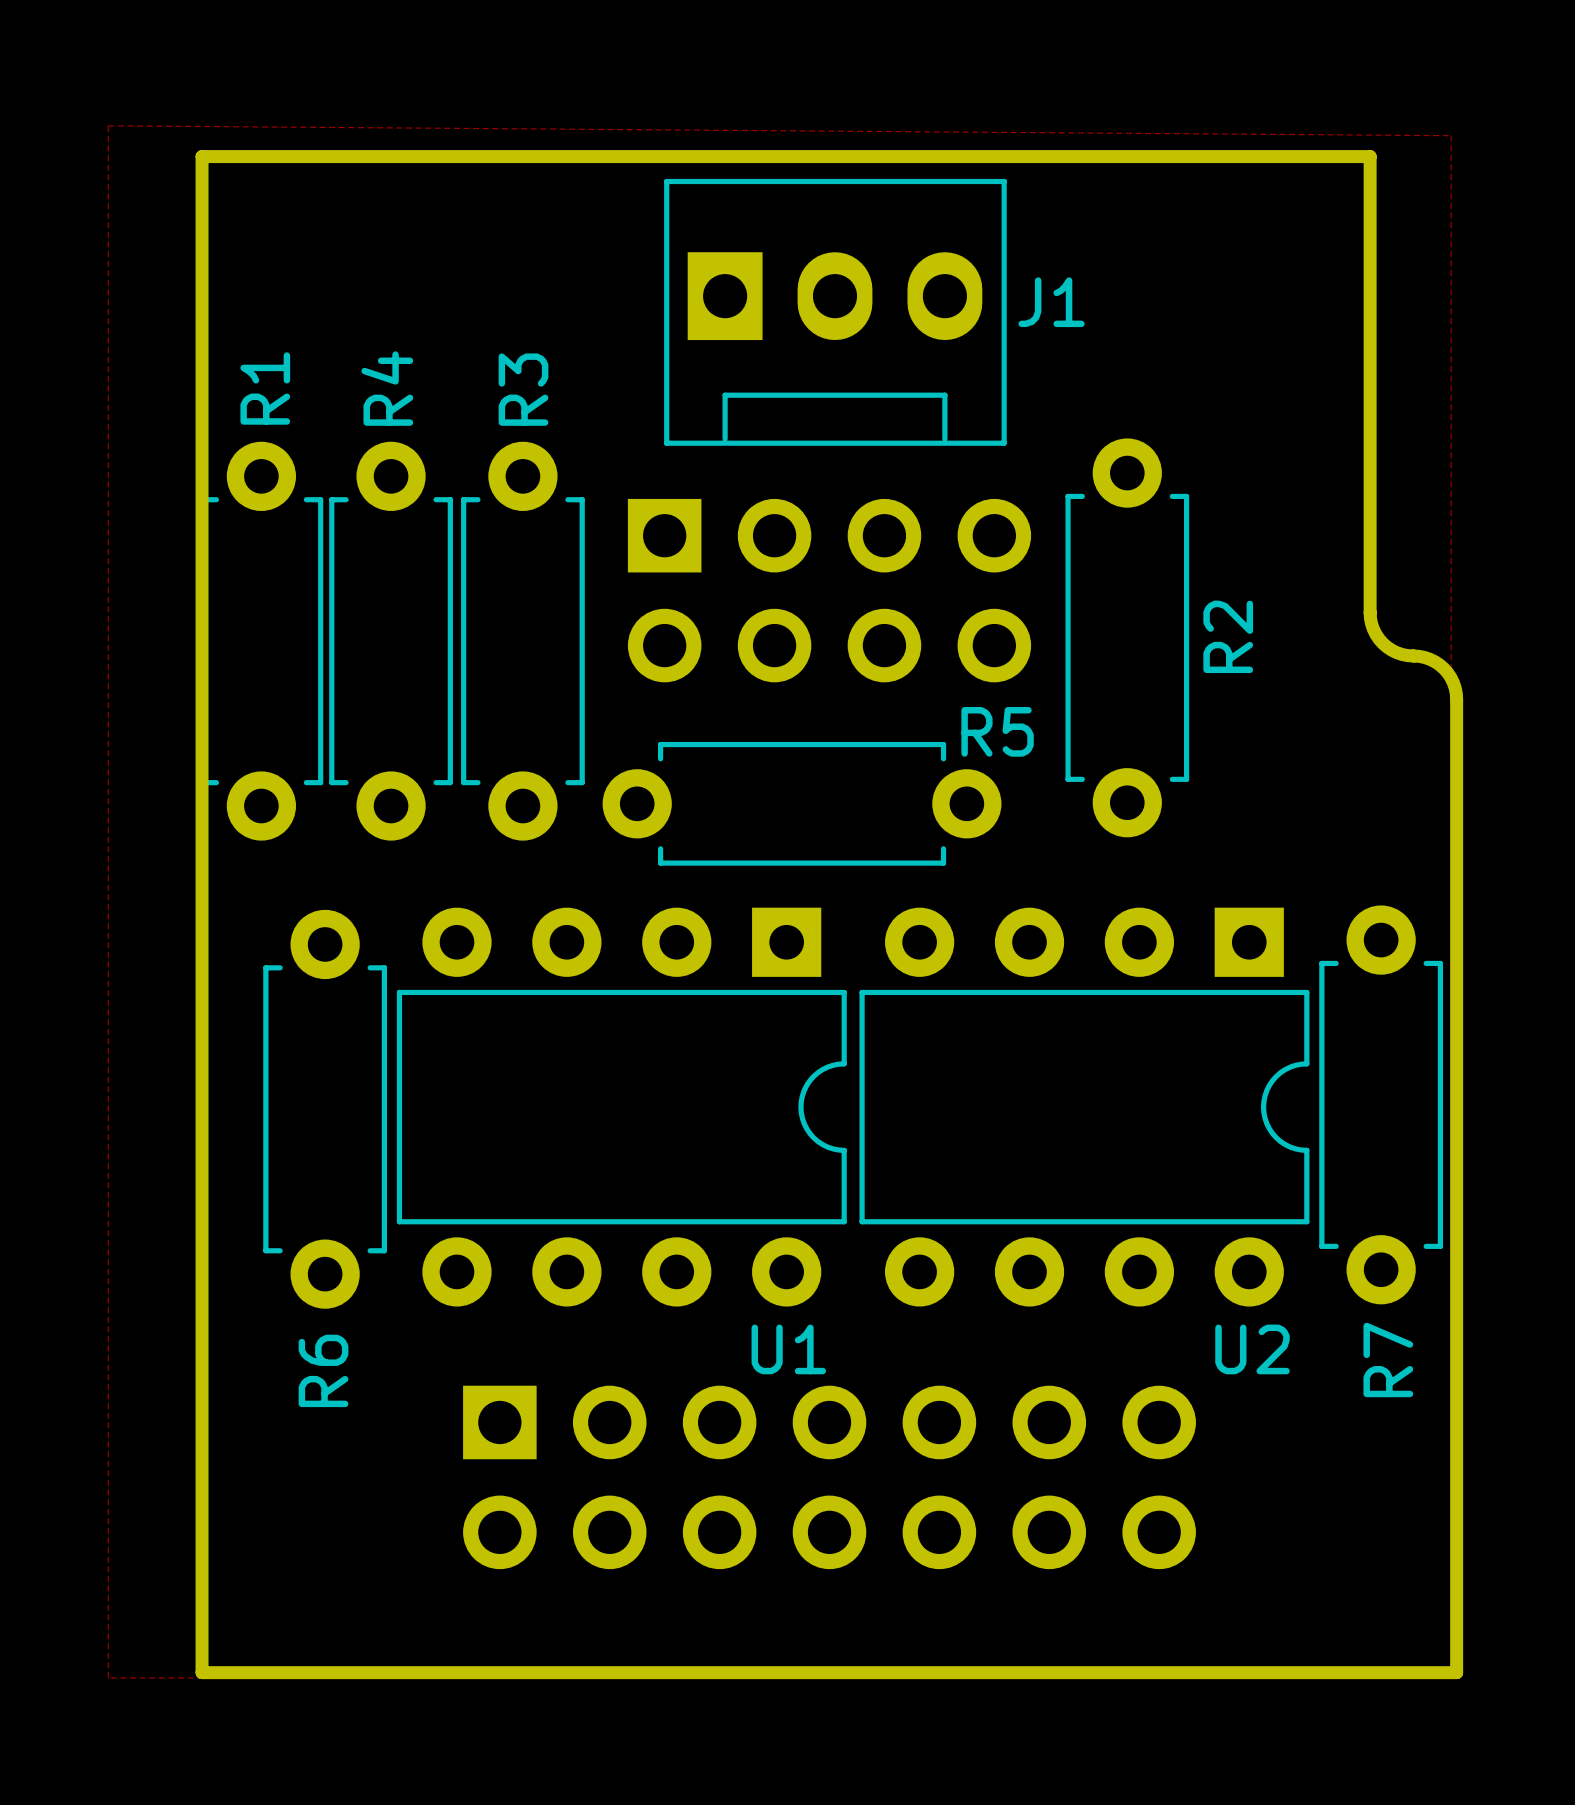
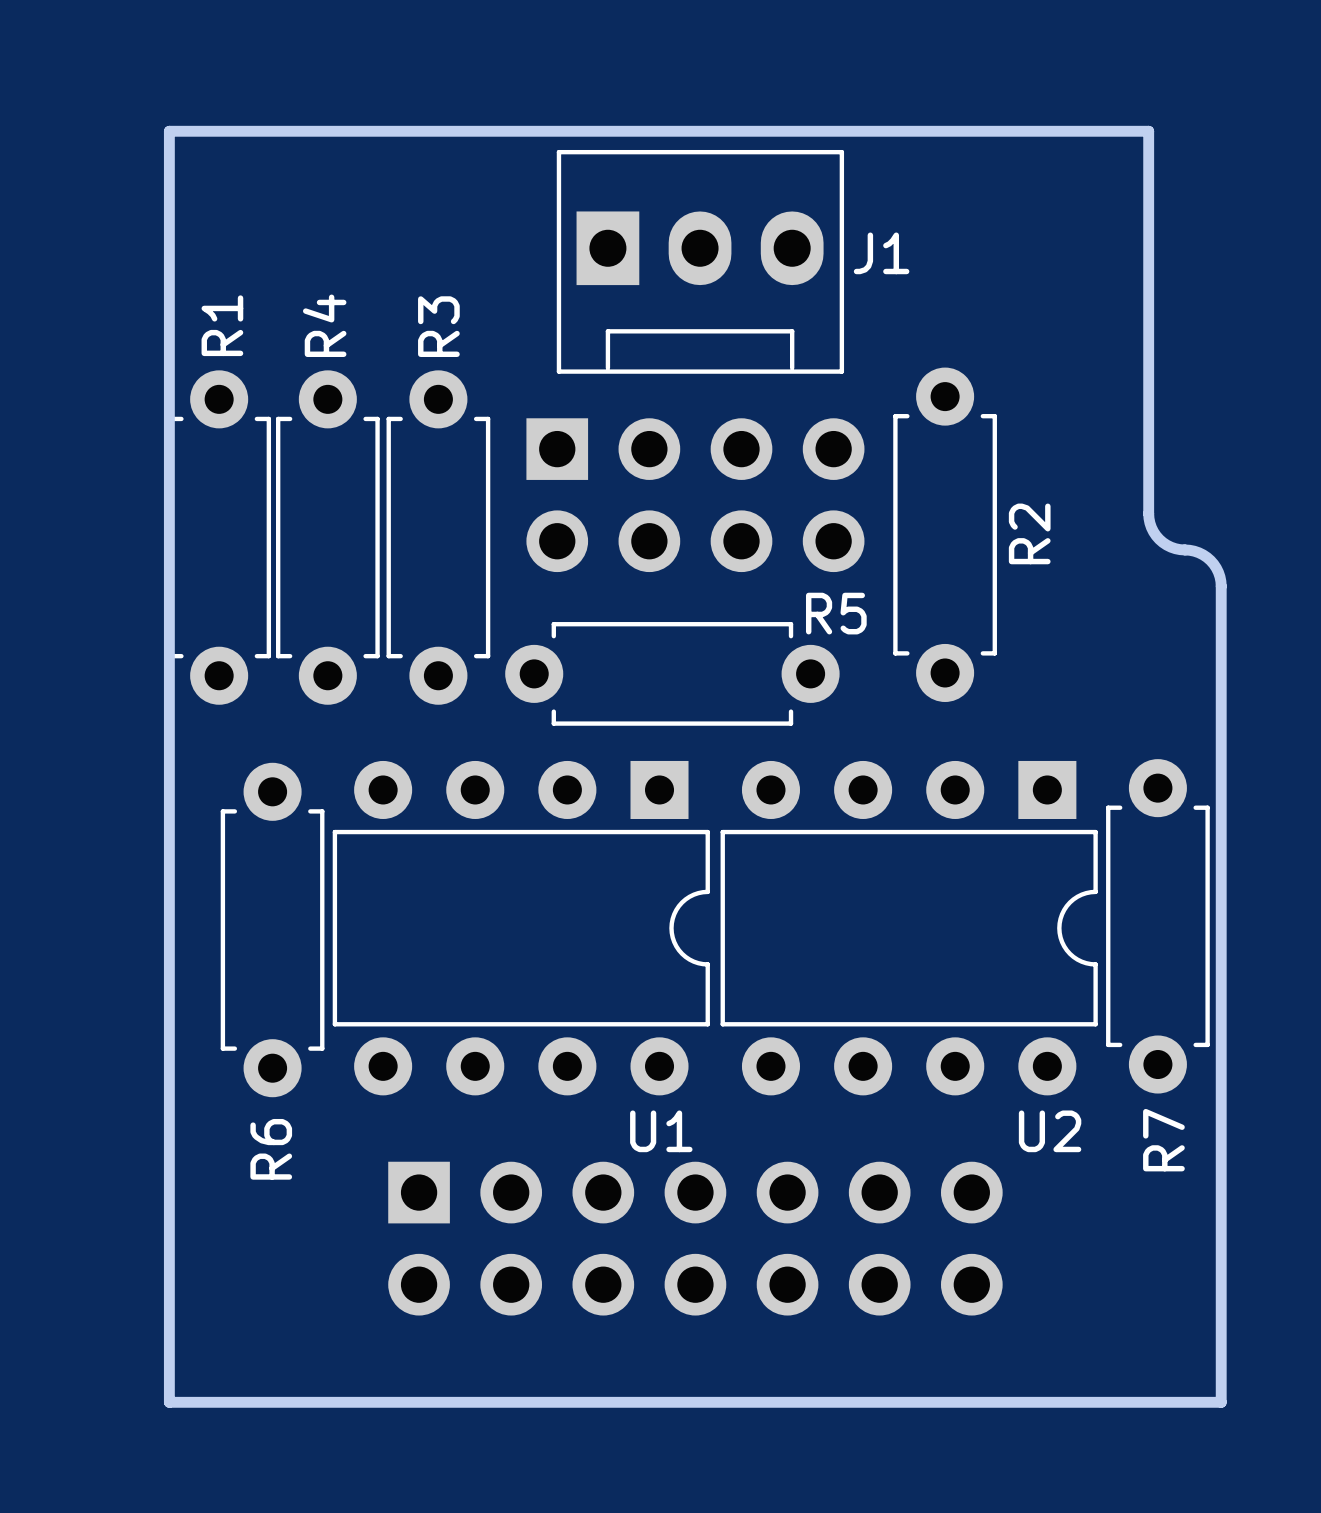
zone outline: (108, 125) (108, 1677) (1451, 1677) (1451, 135) (108, 125) -> none

